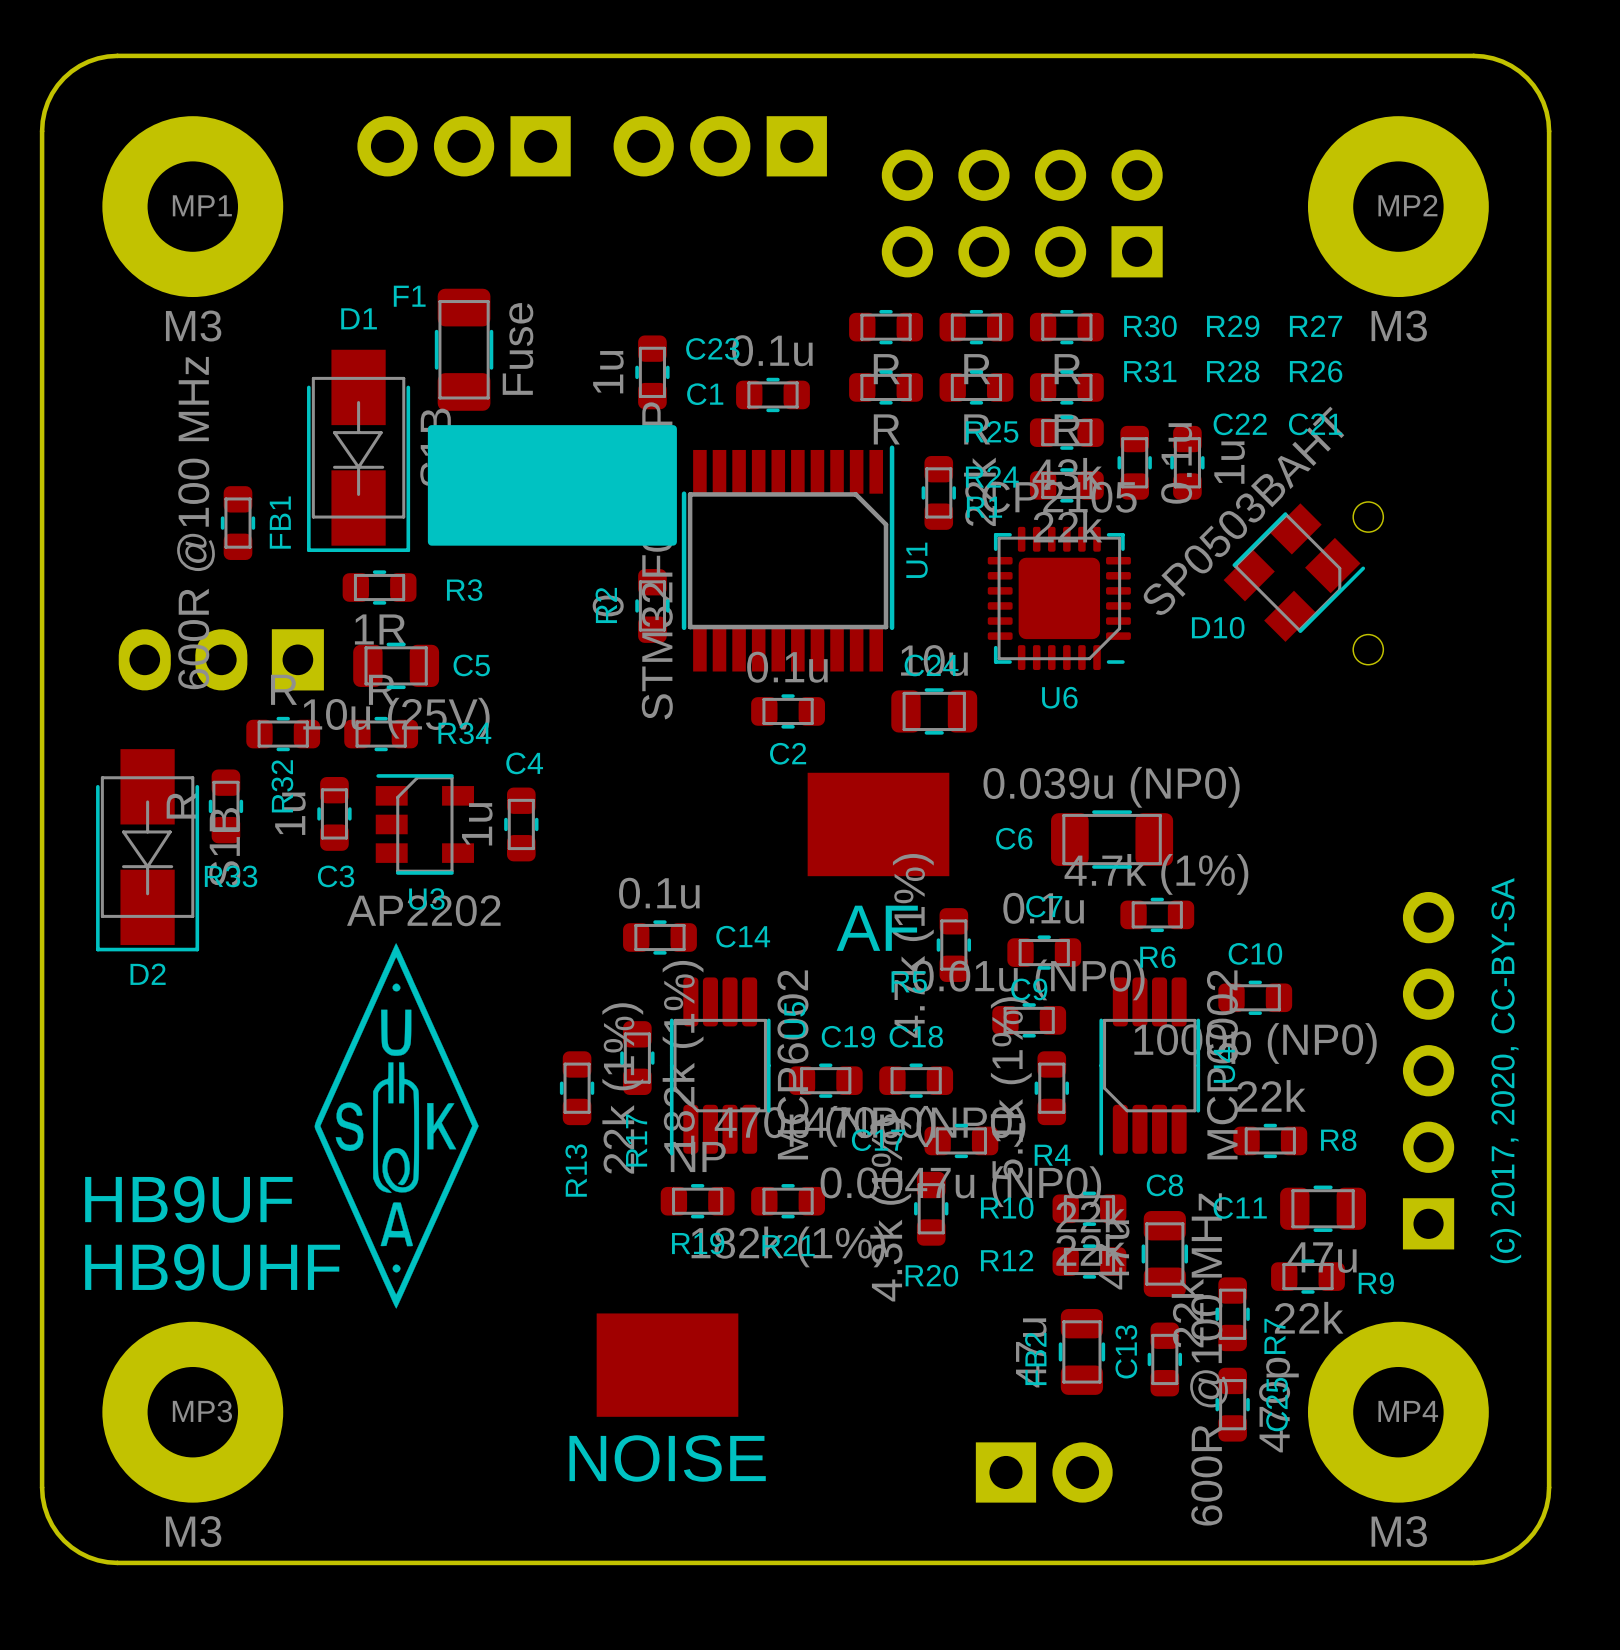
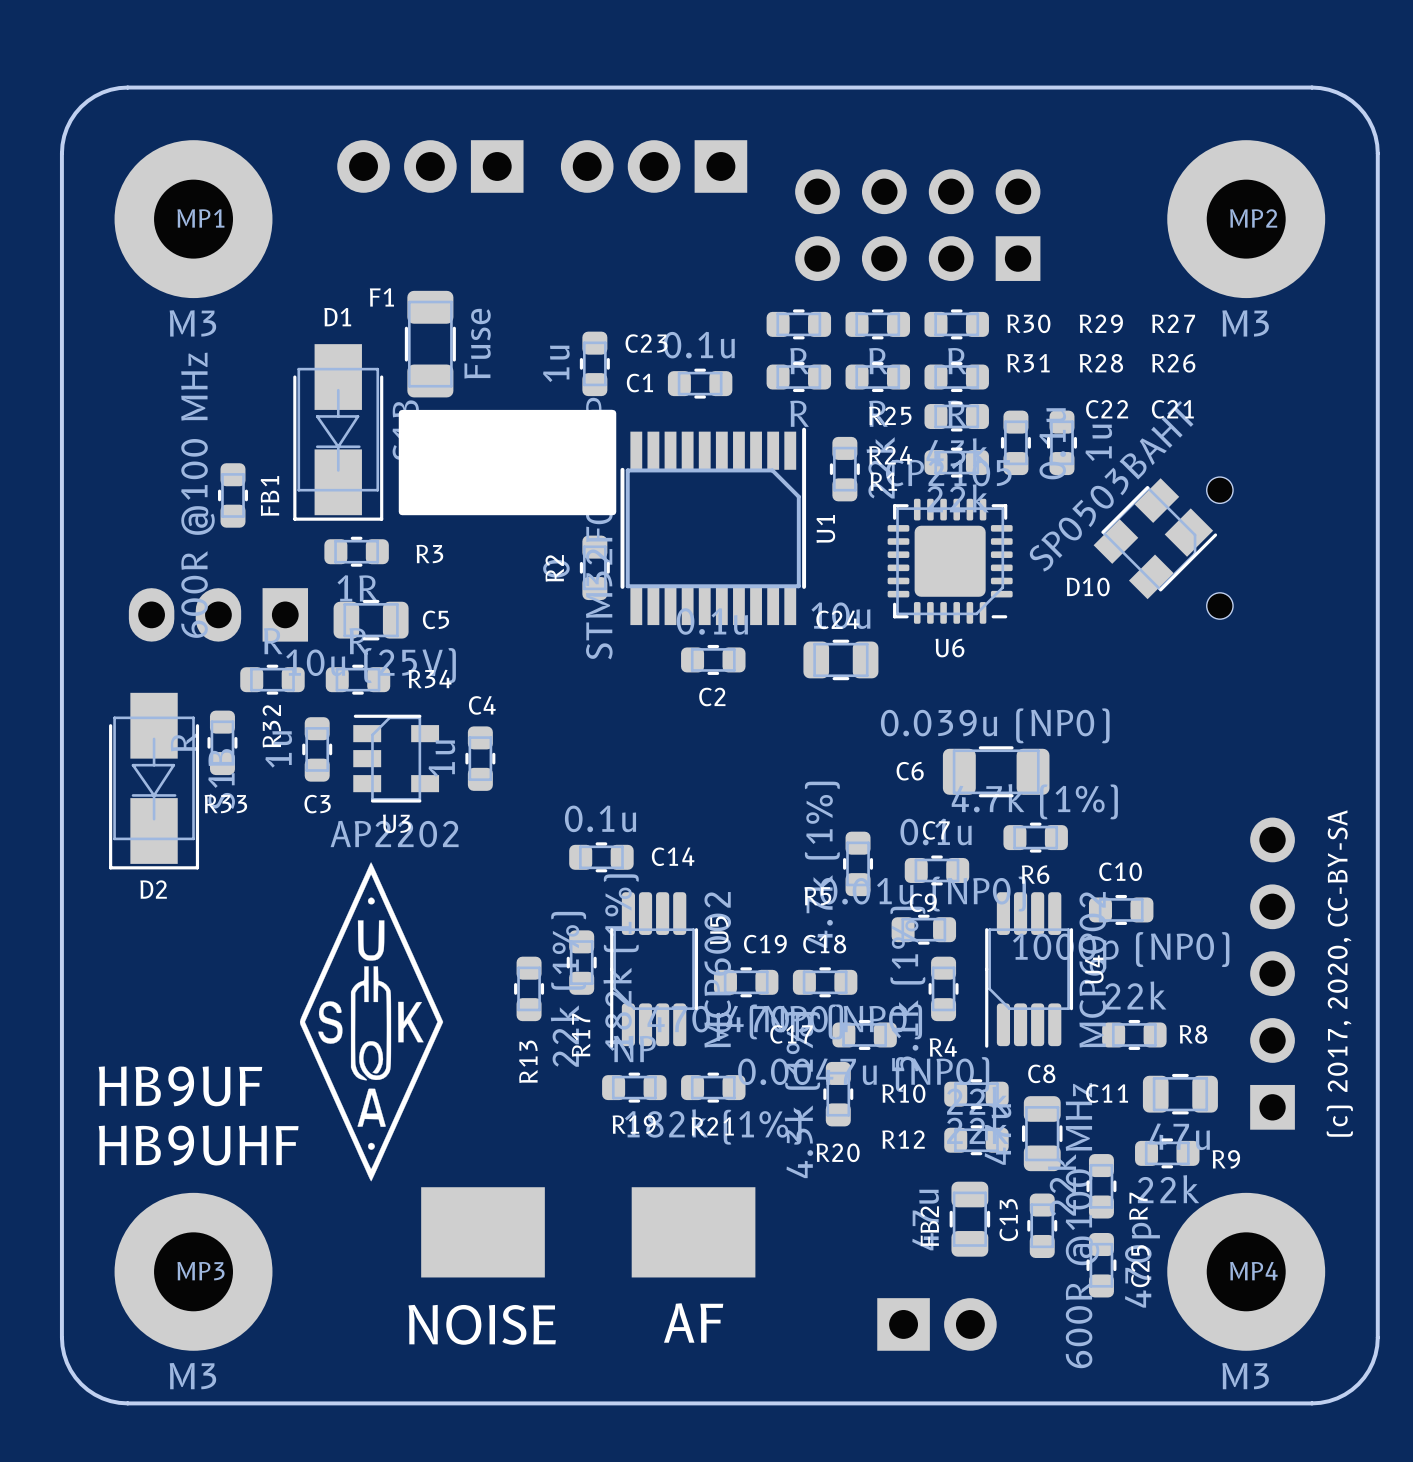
part position: (878, 824) -> (693, 1232)
part position: (667, 1365) -> (483, 1232)
part value position: NOISE (667, 1458) -> NOISE (482, 1324)

